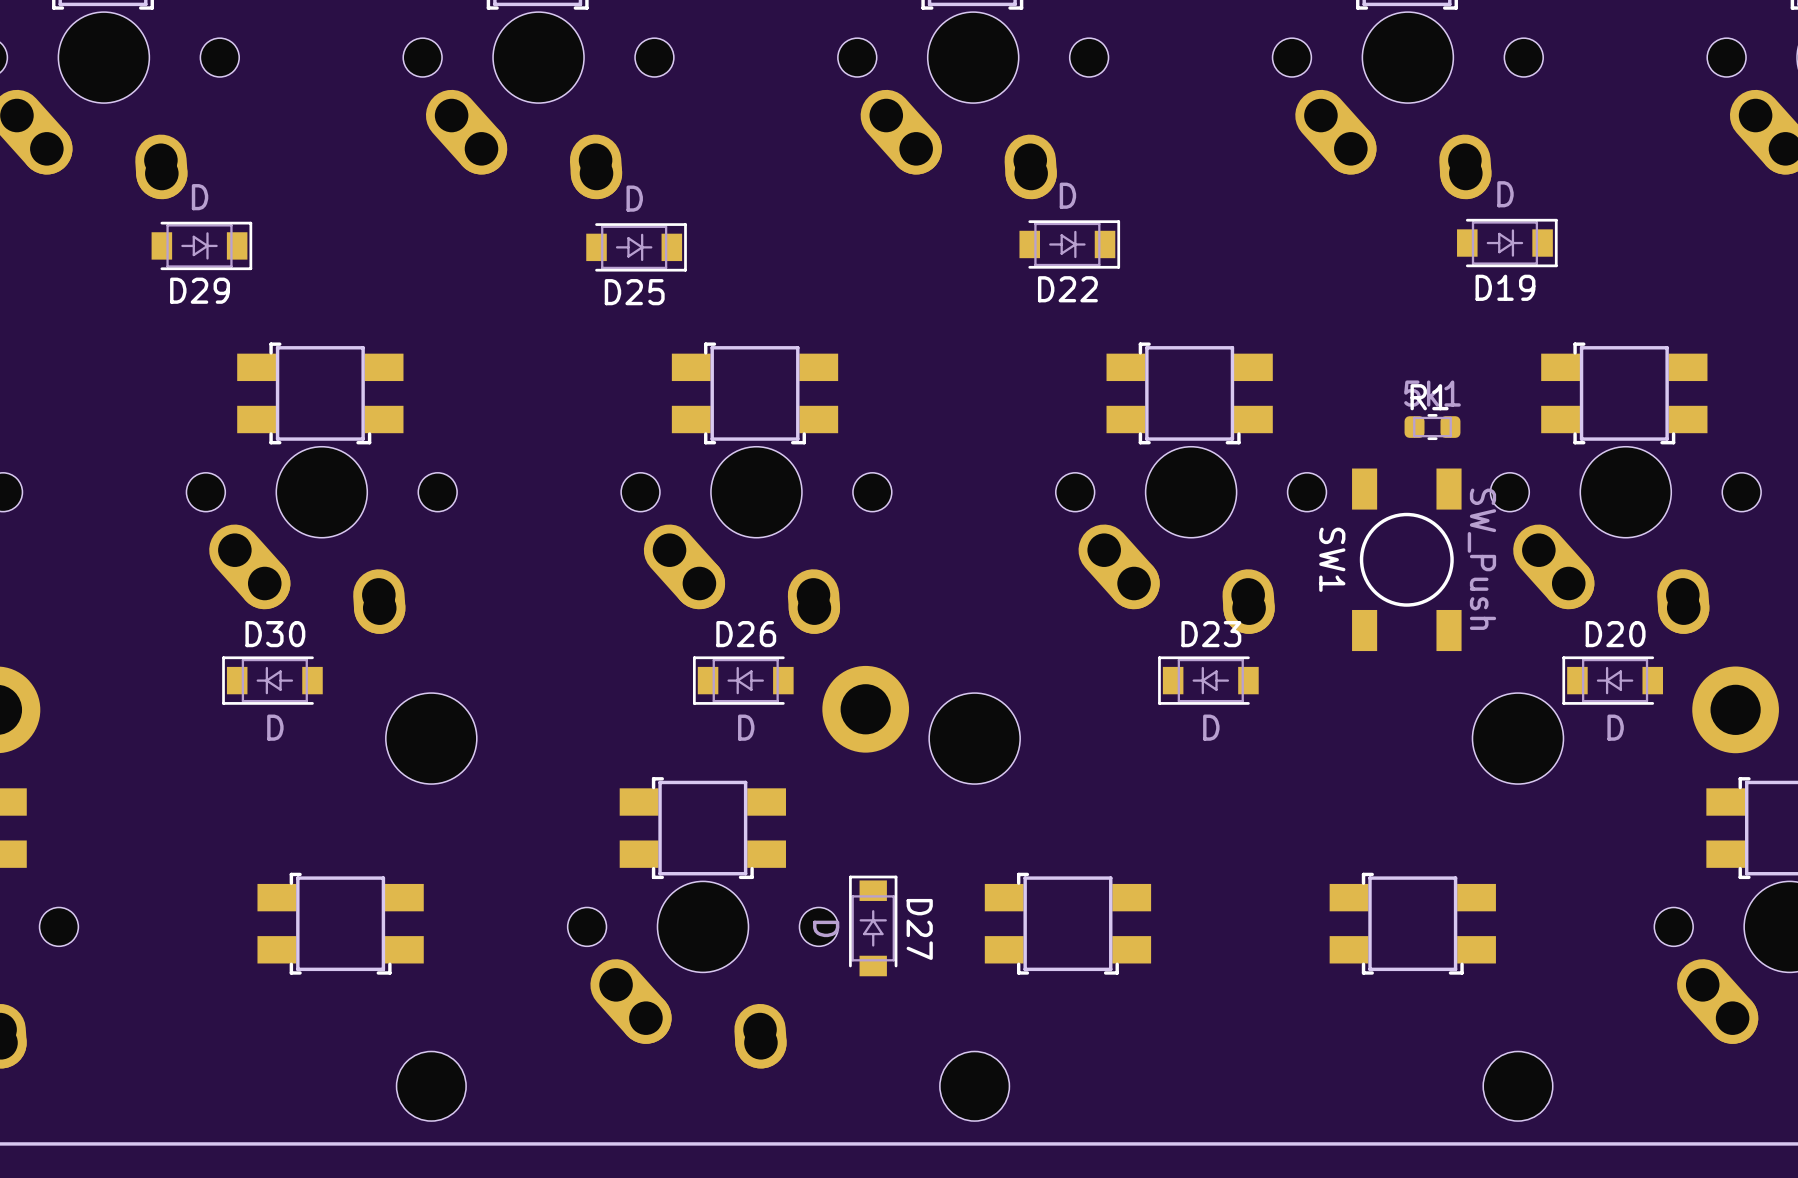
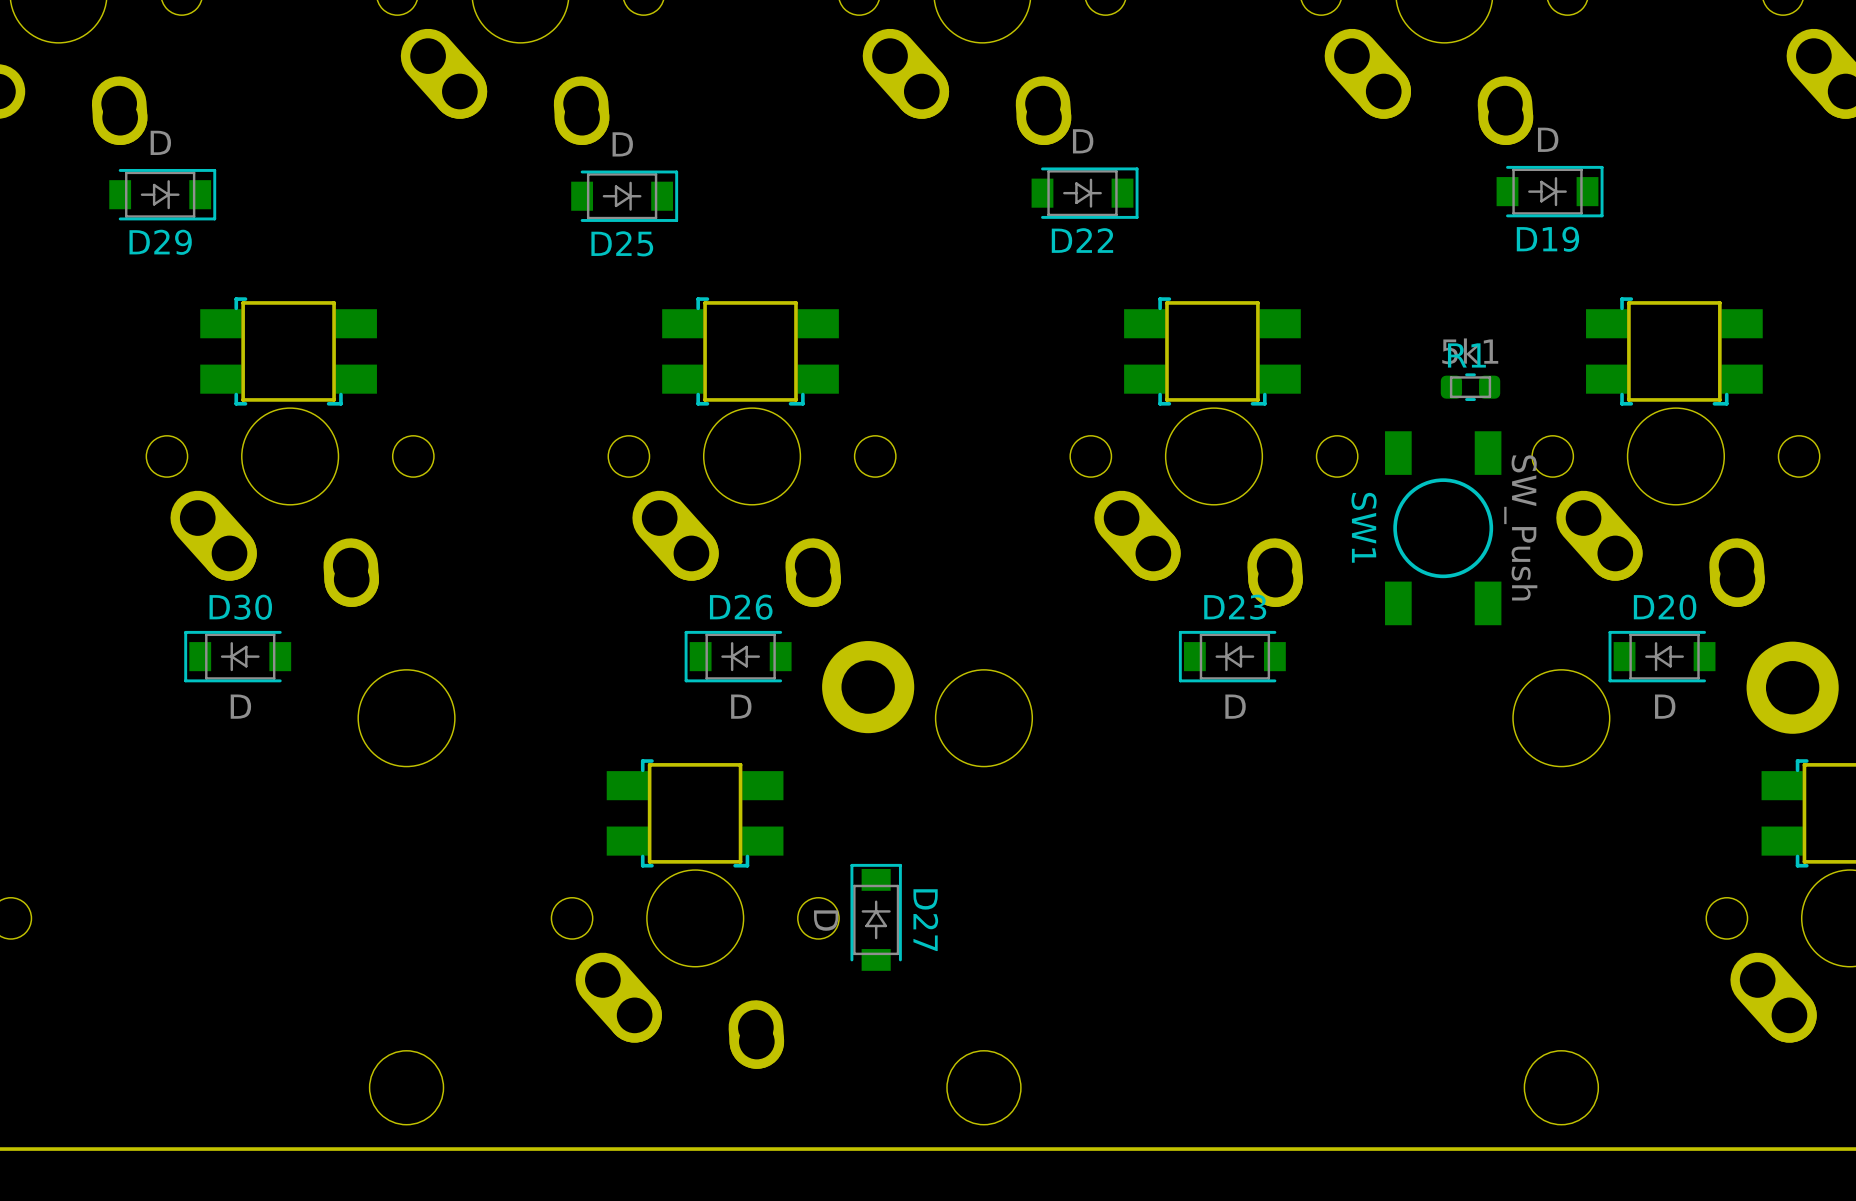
part: (340, 923) -> none
part: (1067, 923) -> none
part: (1412, 923) -> none

